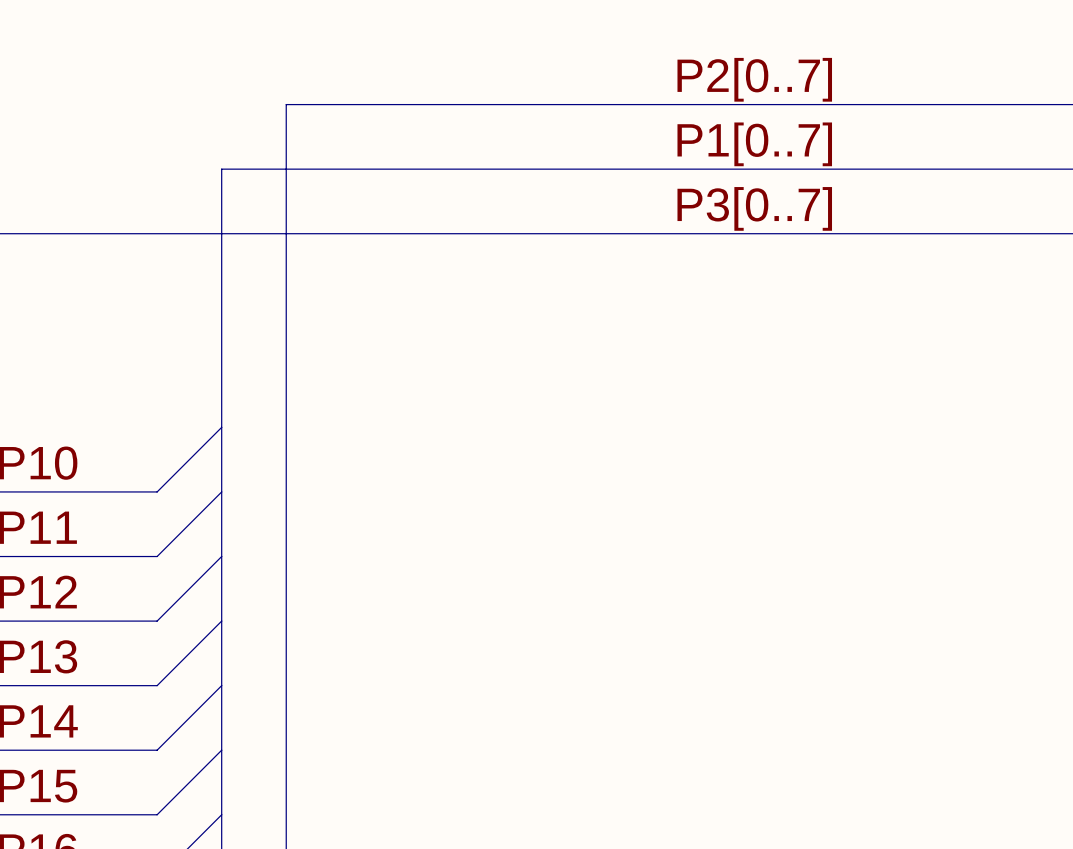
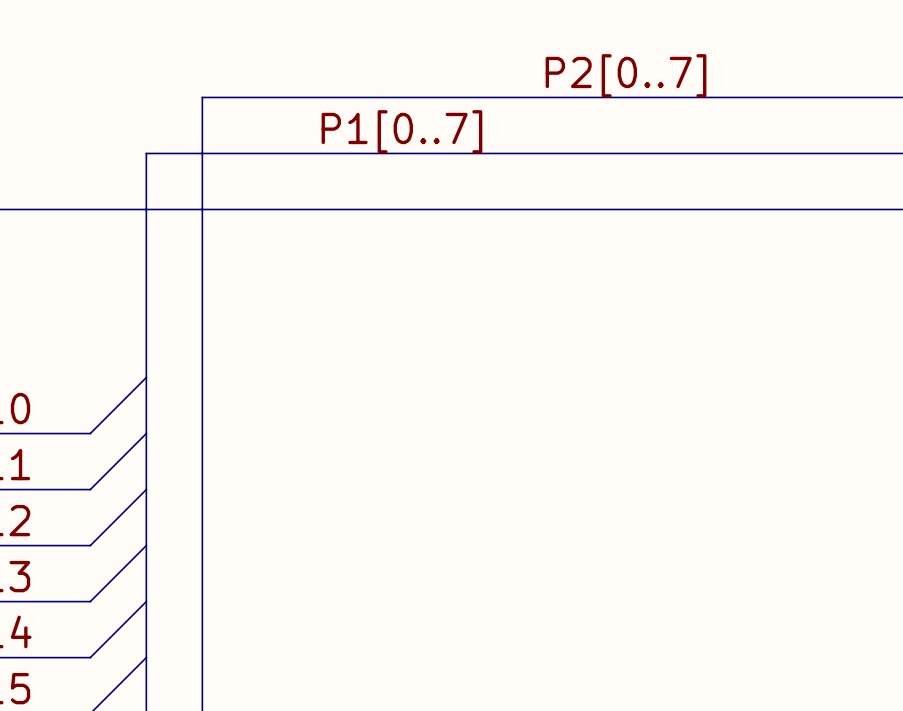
label position: P1[0..7] (754, 144) -> P1[0..7] (401, 131)
label: P3[0..7] (754, 208) -> none

